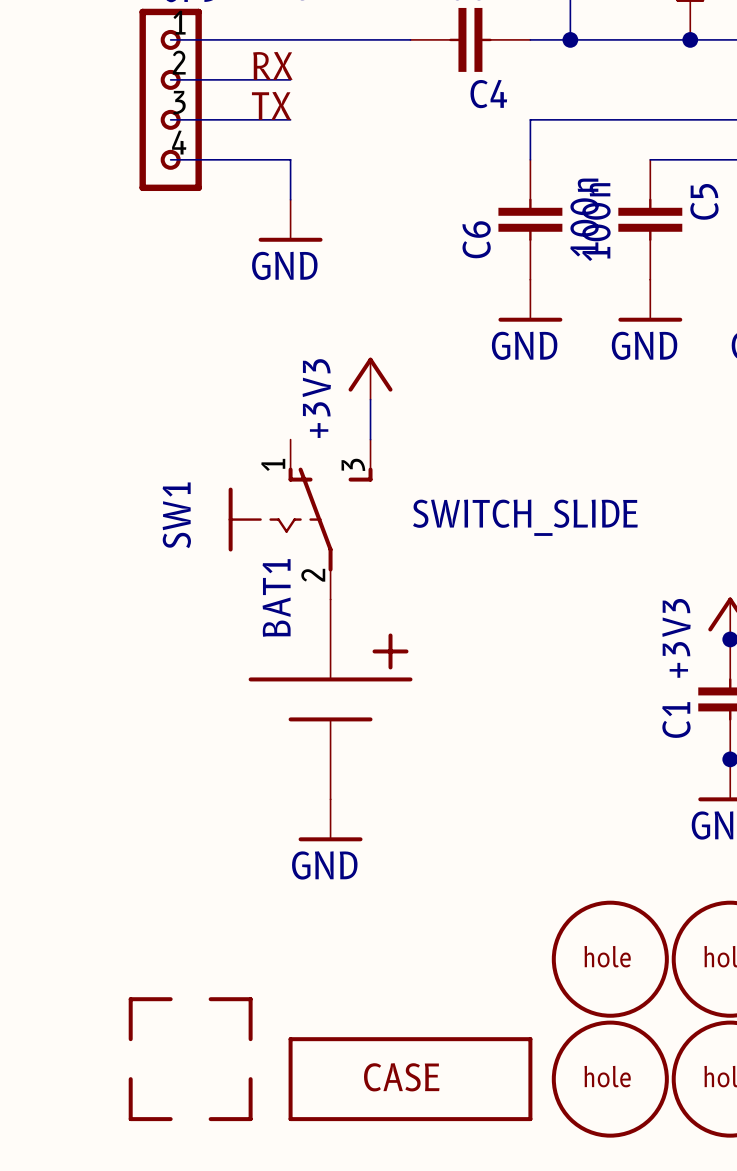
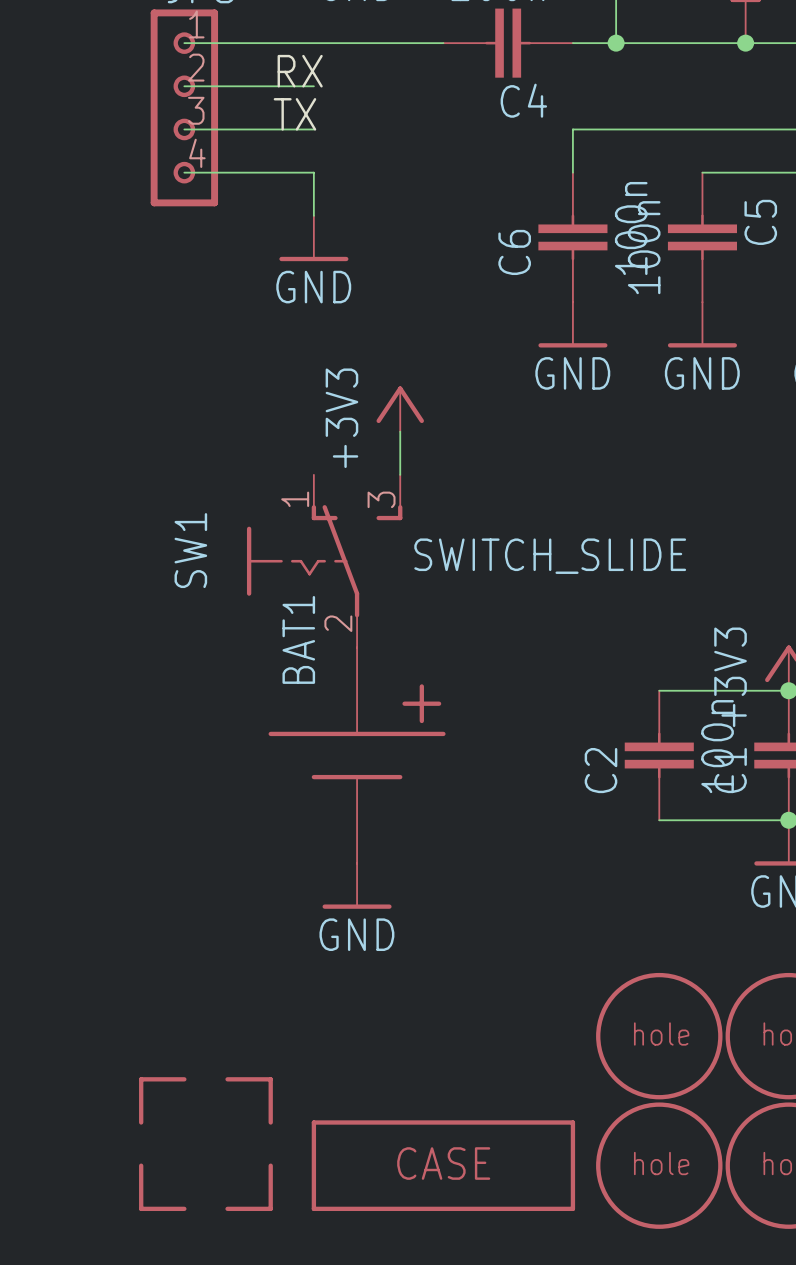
wire: none -> (659, 690) (788, 690)
C2: none -> 100n (659, 755)
wire: none -> (659, 820) (788, 820)

